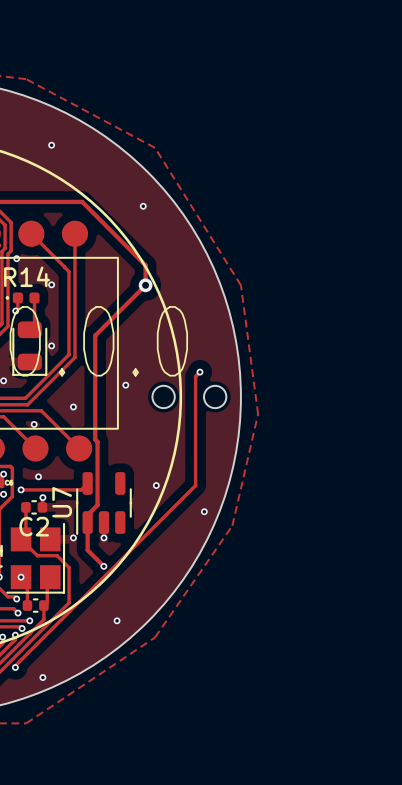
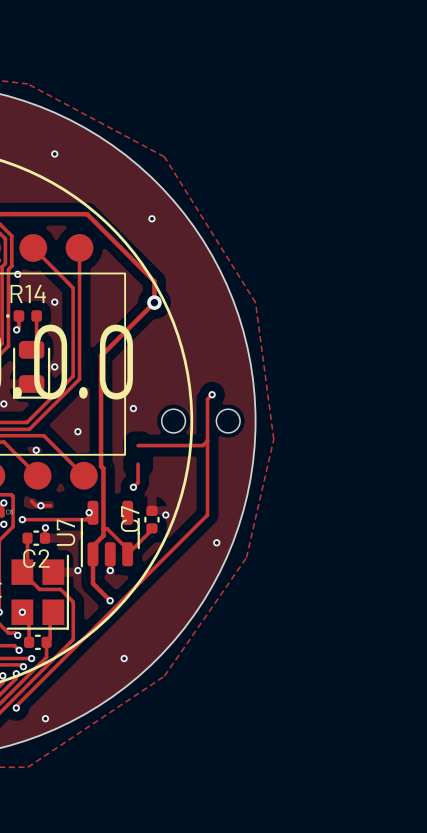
track: none -> (207, 440) (202, 445) (138, 445)
track: none -> (138, 464) (138, 482) (133, 487)
via: none -> (133, 487)
track: none -> (31, 501) (36, 505) (50, 505)
via: none -> (89, 512)
C7: none -> (151, 519)
track: none -> (151, 528) (127, 554) (127, 549) (107, 528) (103, 528)

